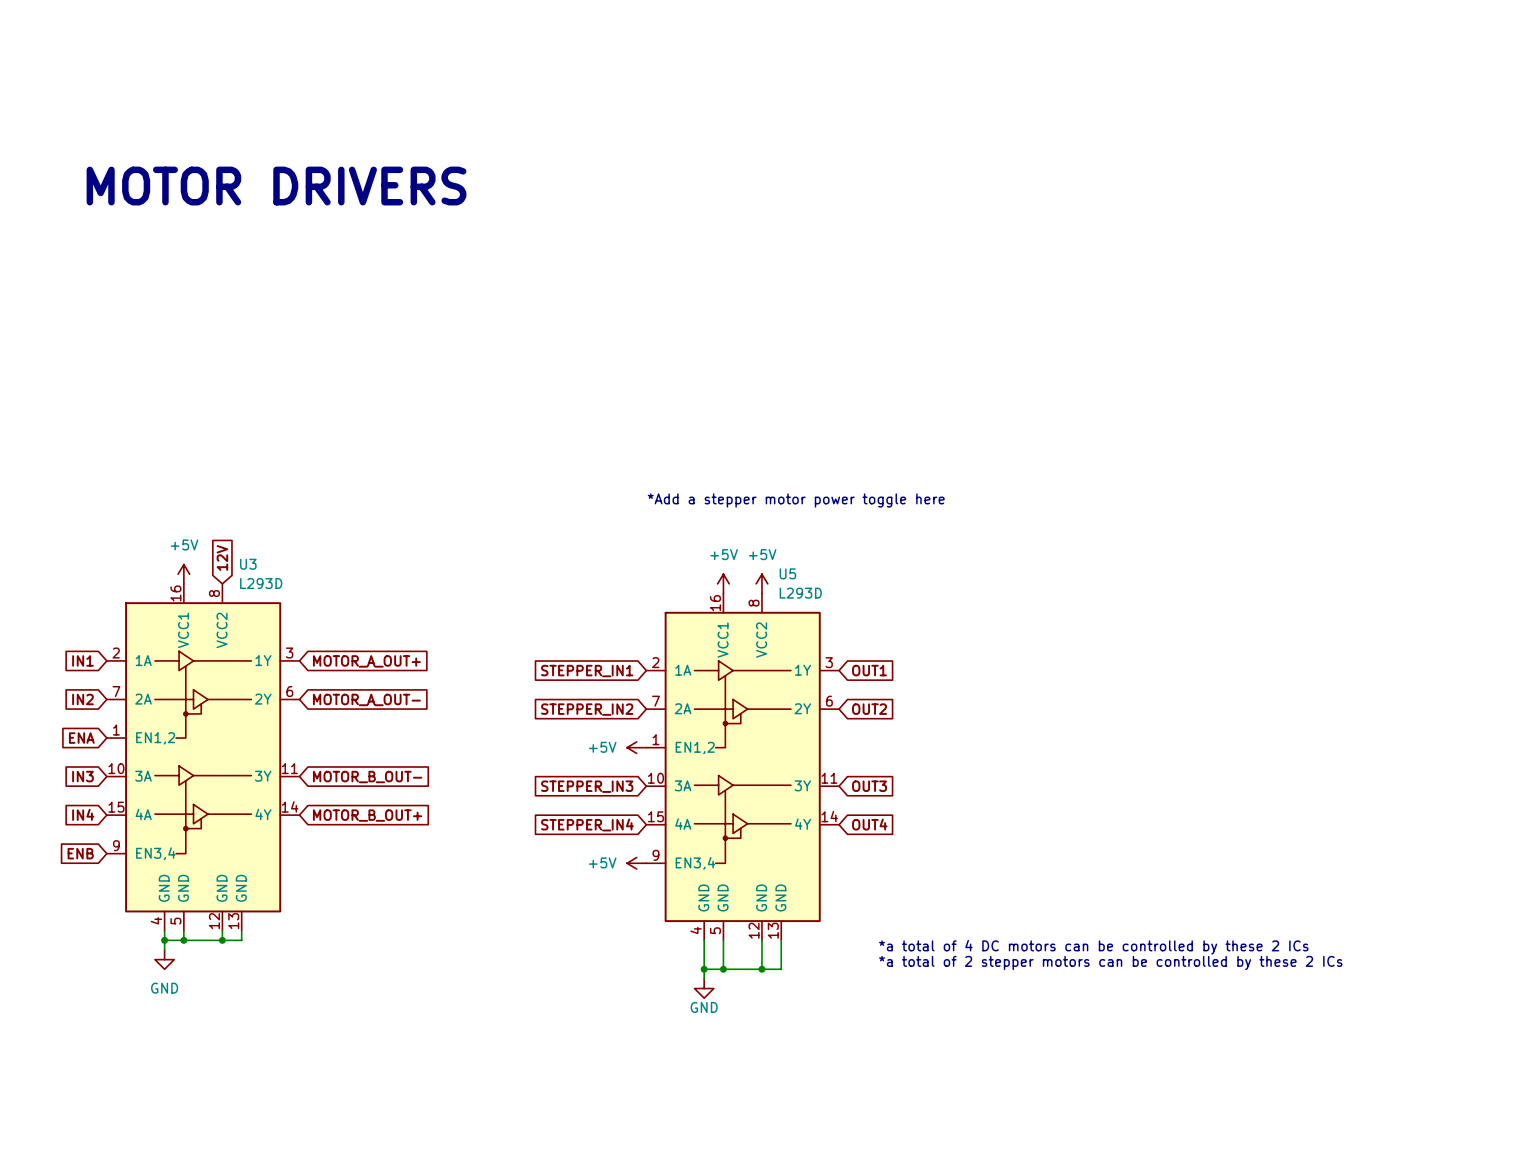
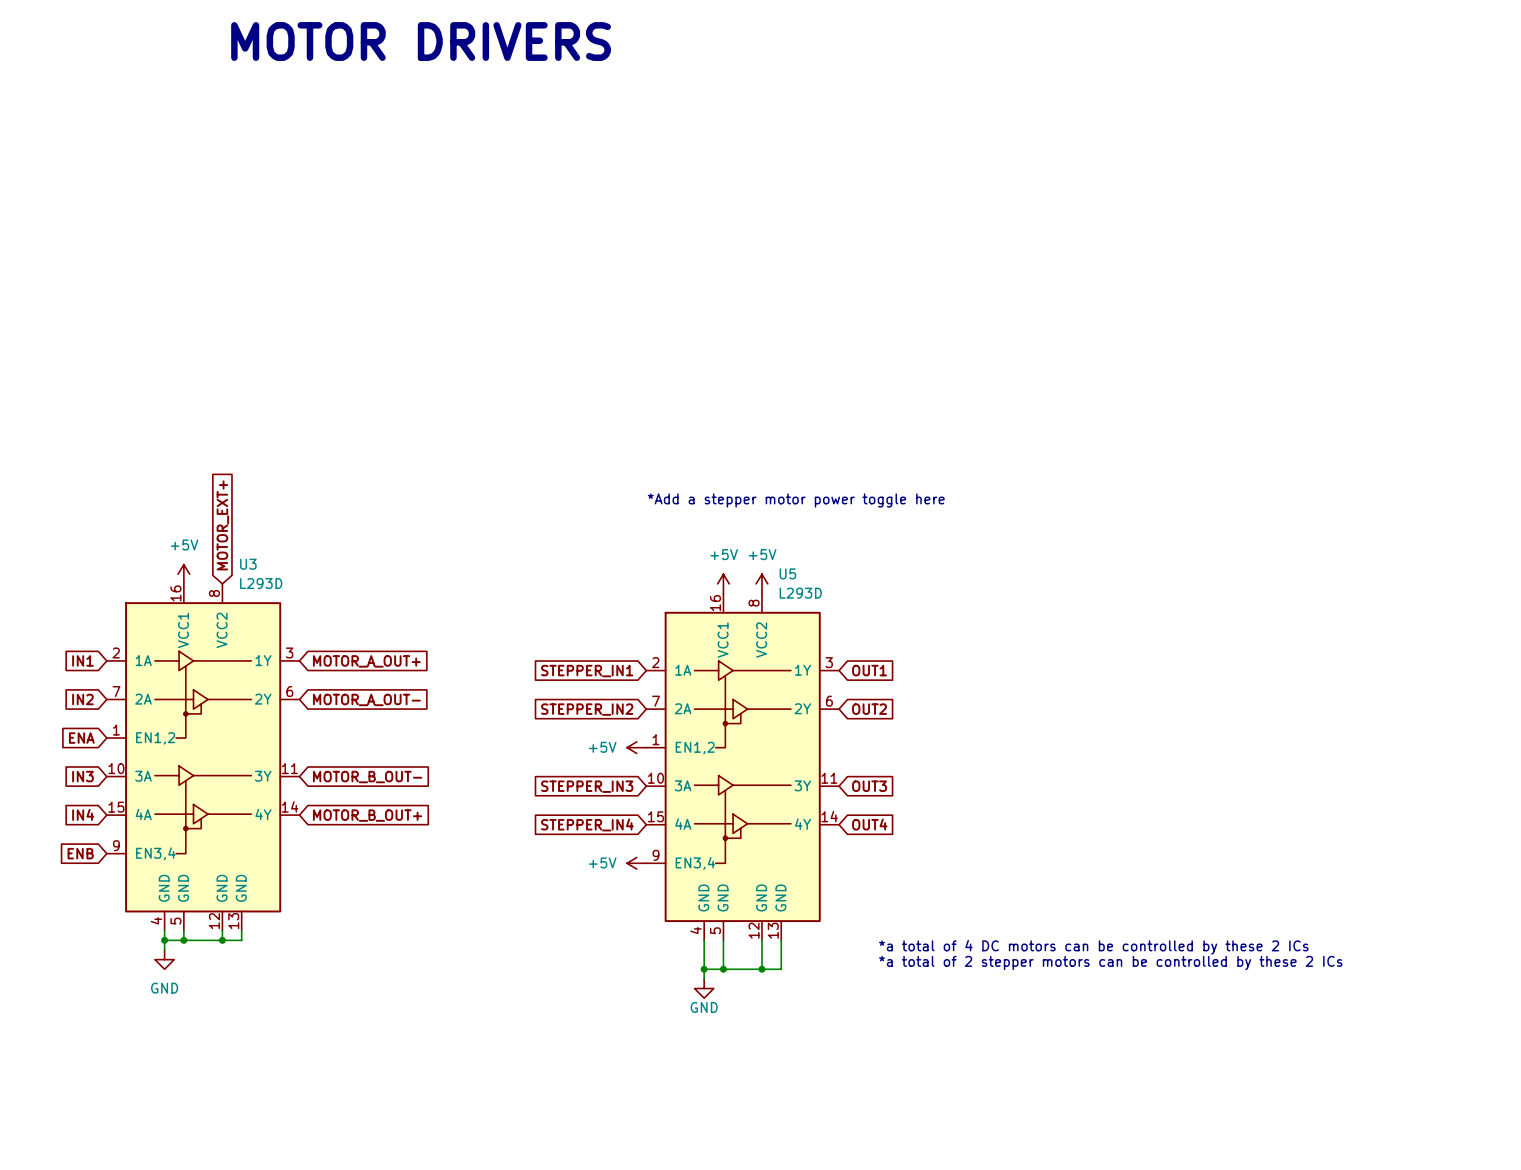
text: none -> MOTOR DRIVERS (421, 41)
text: MOTOR DRIVERS (276, 186) -> none
global label: 12V (222, 557) -> MOTOR_EXT+ (222, 525)

